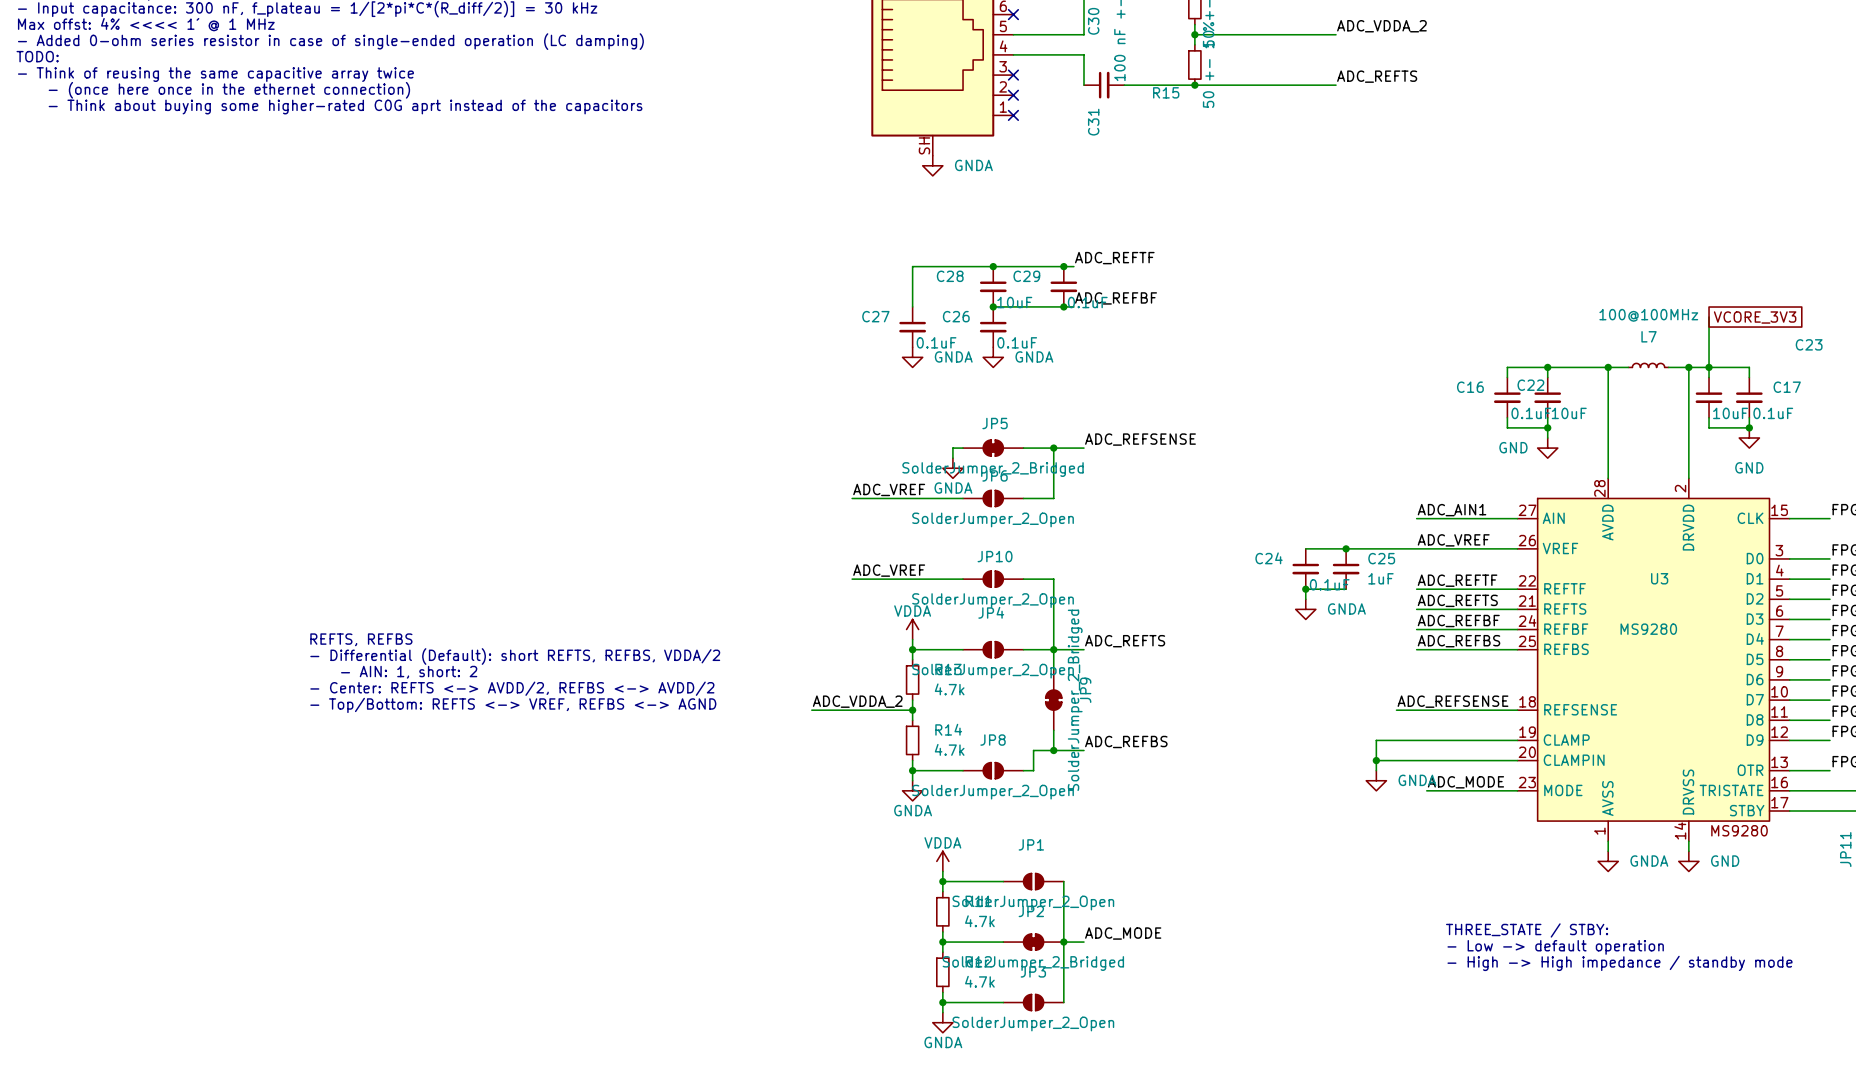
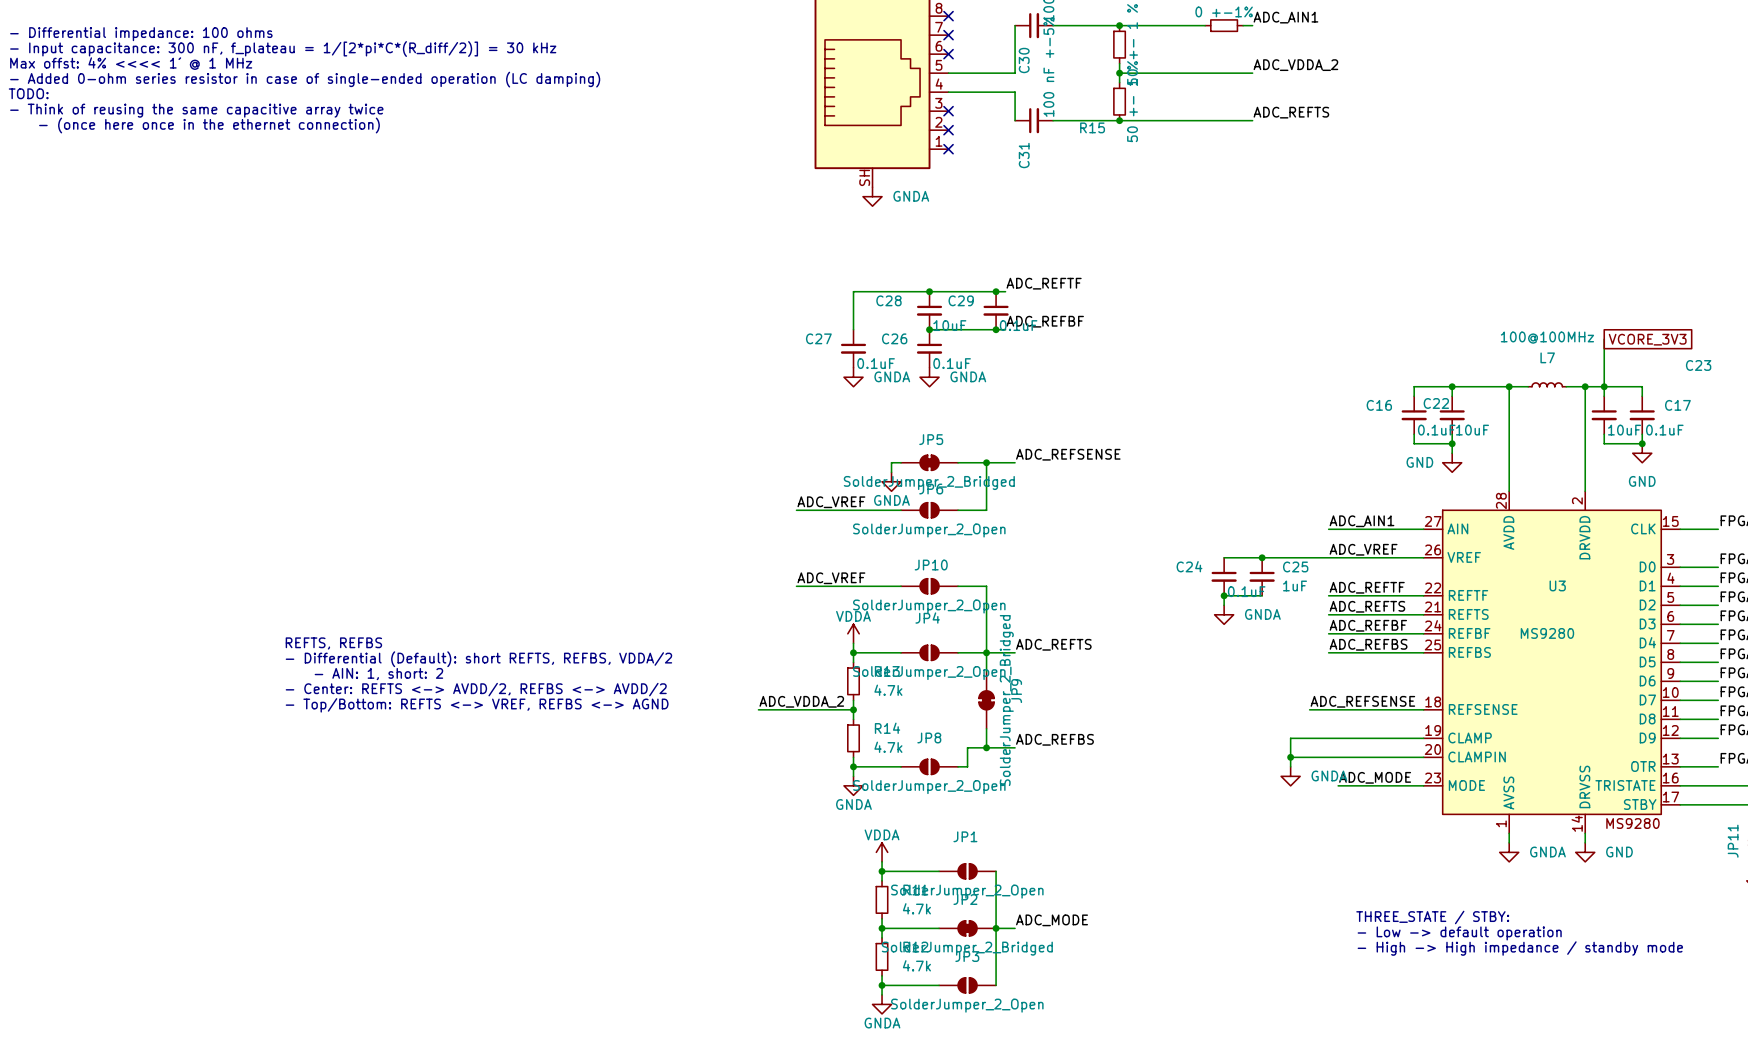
text: - Think about buying some higher-rated C0G aprt instead of the capacitors (345, 107) -> none

